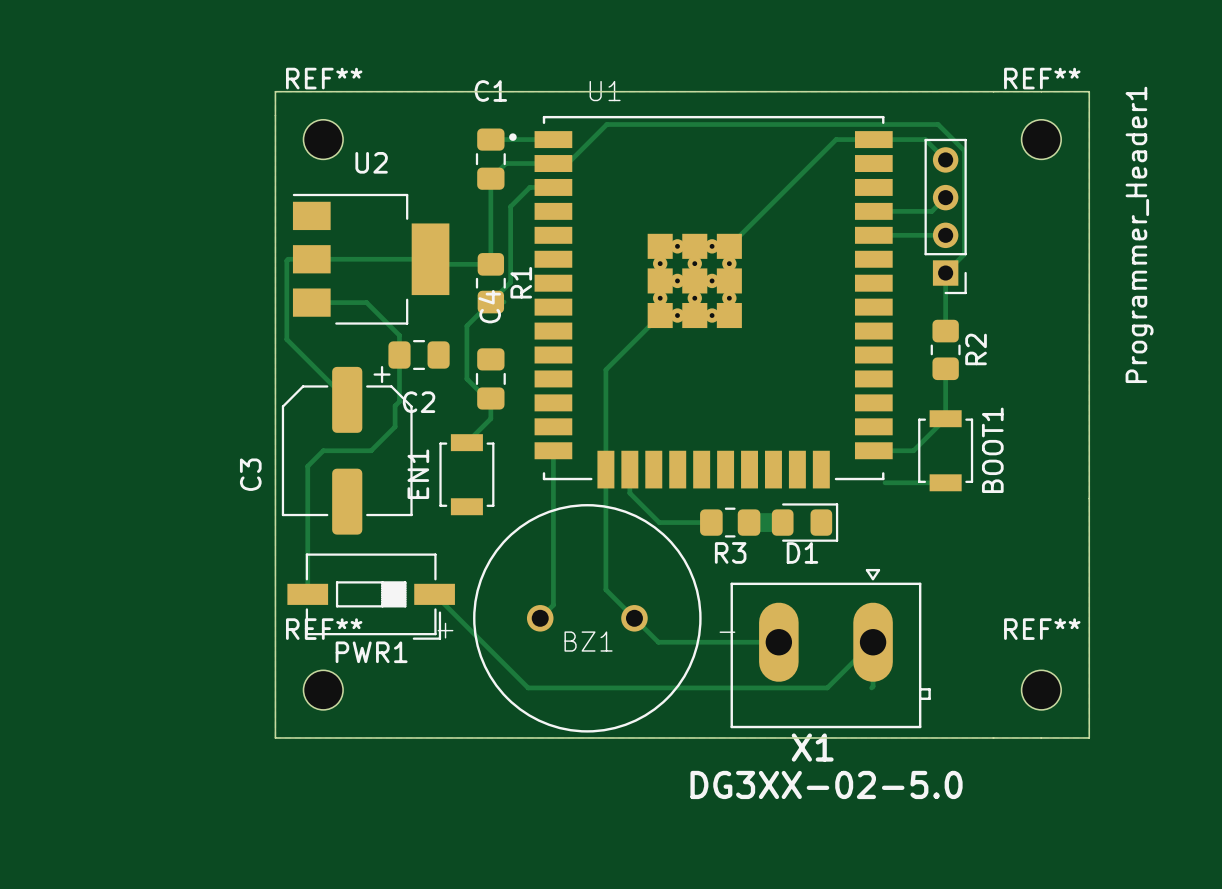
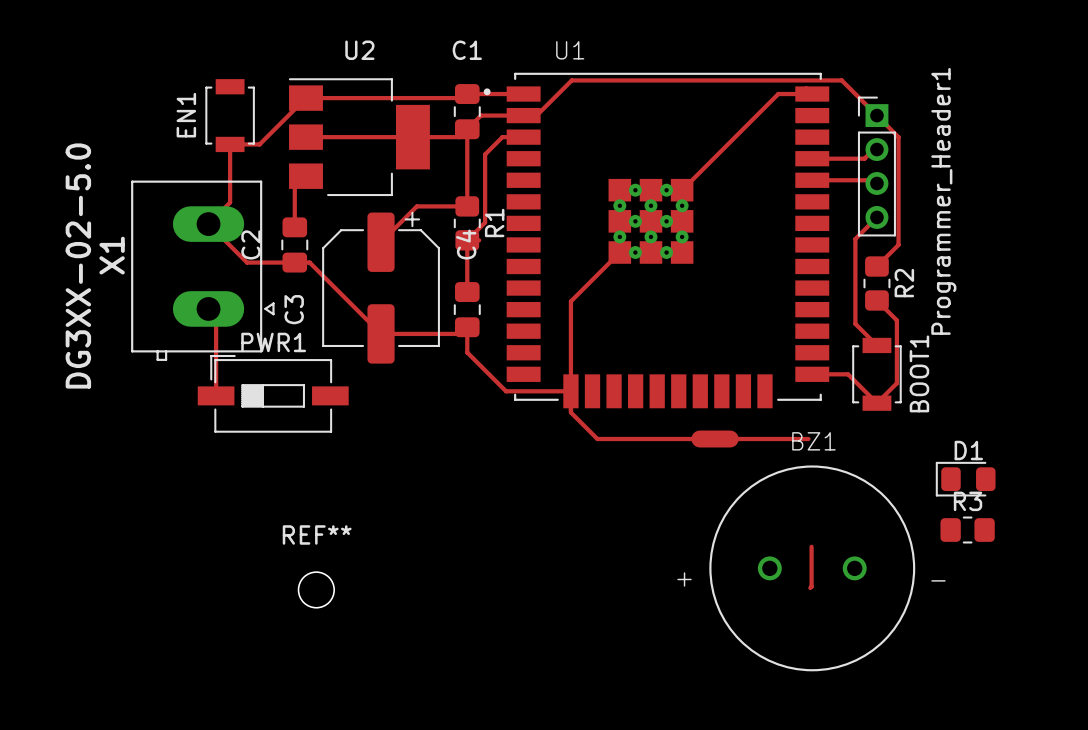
board edge: (275, 91) (1089, 91) (1089, 737) (275, 737) (275, 91) -> none
track: (906, 124) (938, 124) (964, 150) (964, 254) (945, 273) (945, 331) -> (841, 80) (898, 137) (898, 244) (876, 266)
REF**: (323, 139) -> none
track: (880, 139) (925, 139) (945, 159) -> none
REF**: (1041, 139) -> none
track: none -> (306, 137) (459, 137)
Programmer_Header1 rotation: 0° (945, 216) -> 180° (876, 166)
track: none -> (306, 176) (294, 187) (294, 227) (302, 234)
Programmer_Header1 name position: Programmer_Header1 (1139, 234) -> Programmer_Header1 (943, 201)
U2 position: (371, 259) -> (359, 137)
track: (435, 264) (430, 259) (286, 260) (286, 339) (347, 399) -> (417, 206) (381, 242) (369, 231)
track: none -> (876, 217) (855, 239) (855, 323) (876, 345)
track: (311, 302) (366, 302) (399, 335) (399, 401) (395, 405) (395, 426) (371, 450) (323, 450) (307, 466) (307, 594) -> none
track: (490, 302) (466, 325) (466, 378) (486, 398) (490, 398) -> (463, 98) (306, 98) (259, 144) (230, 144) (230, 202) (208, 224) (247, 262) (309, 262) (381, 333) (460, 333) (467, 327)
track: none -> (467, 240) (467, 292)
C2 rotation: 0° (419, 355) -> 90° clockwise (294, 244)
C2 position: (419, 355) -> (294, 244)
track: (945, 368) (945, 418) (913, 450) -> (876, 300) (896, 320) (896, 383) (876, 403) (848, 374)
track: none -> (208, 308) (216, 316) (216, 395)
track: (490, 418) (466, 442) -> (467, 345) (467, 352) (506, 391) (570, 391)
C3 position: (347, 450) -> (381, 287)
track: (553, 450) (553, 605) (540, 618) -> none
track: (629, 469) (629, 493) (659, 522) -> (570, 412) (597, 439) (618, 439)
EN1 position: (466, 474) -> (230, 115)
track: (885, 482) (945, 482) -> none
track: (605, 493) (605, 589) (658, 642) (778, 642) -> none
track: none -> (665, 439) (699, 439)
R3 position: (730, 522) -> (967, 530)
track: none -> (730, 439) (808, 439)
D1 rotation: 0° (805, 522) -> 180° (965, 479)
D1 position: (805, 522) -> (965, 479)
R3 name position: R3 (730, 552) -> R3 (968, 501)
track: (434, 594) (528, 687) (827, 687) (881, 633) -> none
PWR1 rotation: 0° (371, 596) -> 180° (273, 393)
PWR1 position: (371, 596) -> (273, 393)
BZ1 position: (587, 618) -> (812, 568)
BZ1 name position: BZ1 (588, 641) -> BZ1 (813, 441)
X1 rotation: 0° (830, 648) -> 90° clockwise (202, 270)
X1 position: (830, 648) -> (202, 270)
REF**: (1041, 690) -> none

